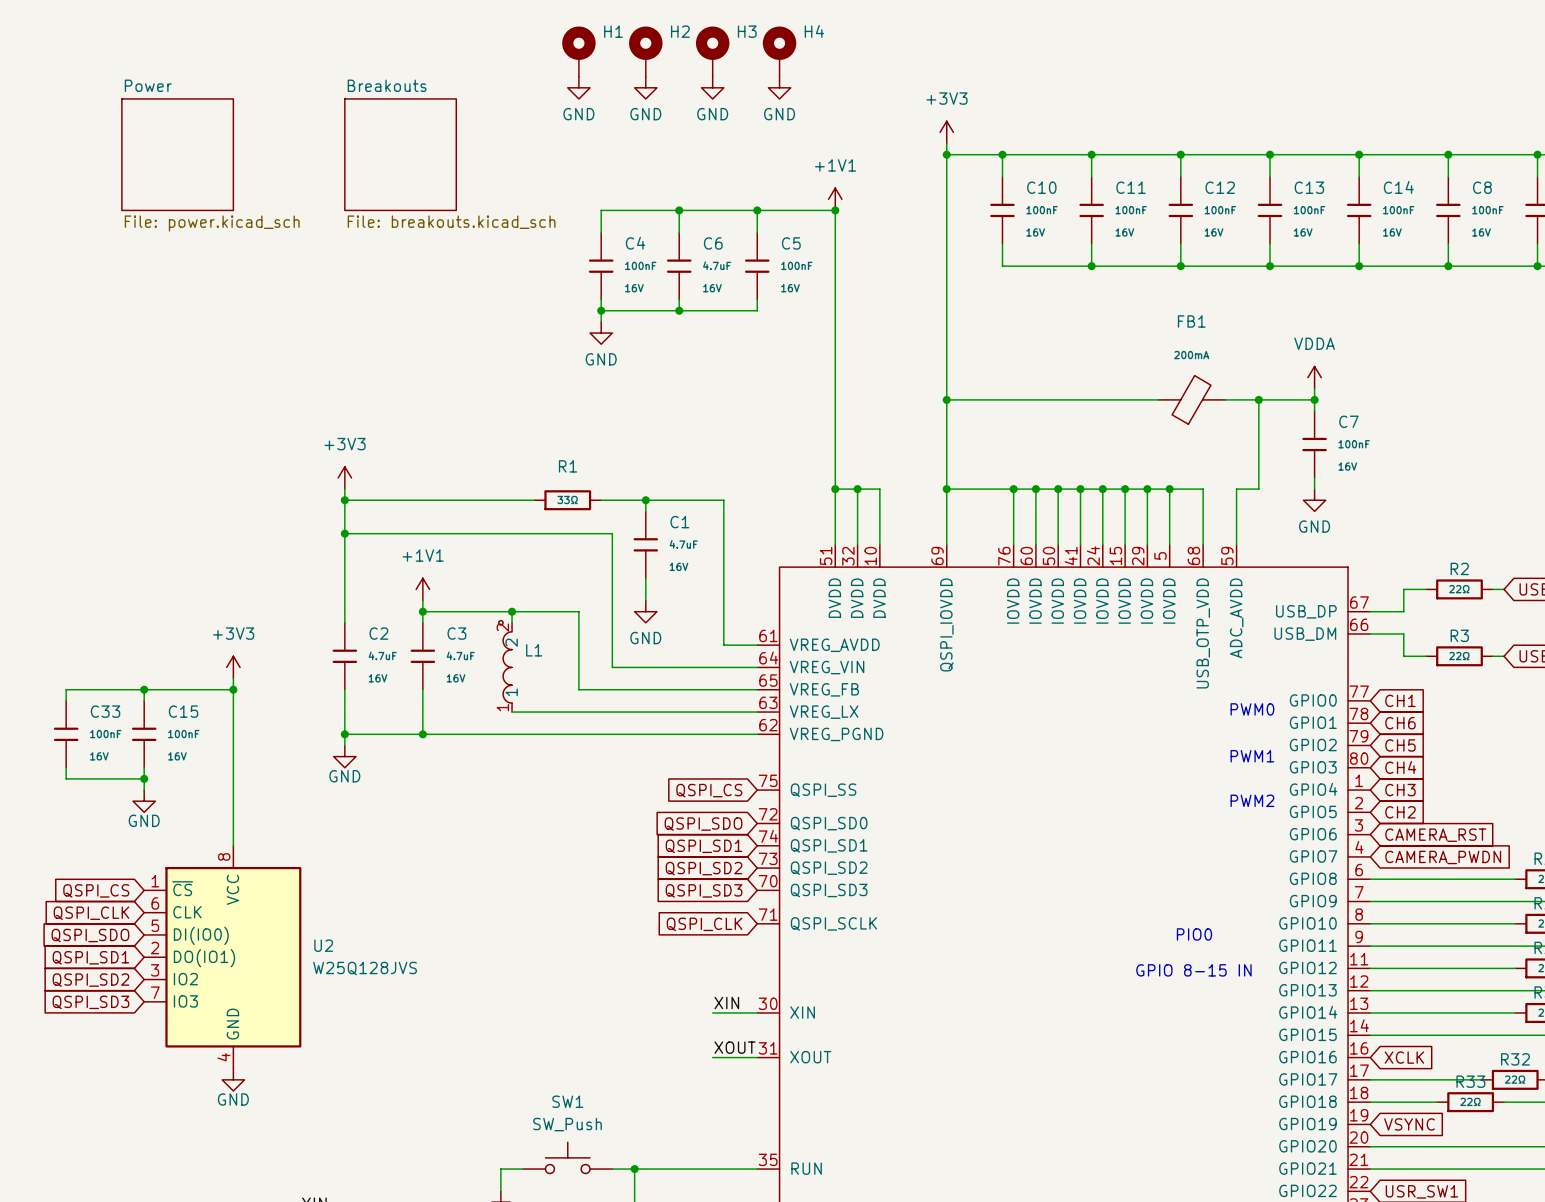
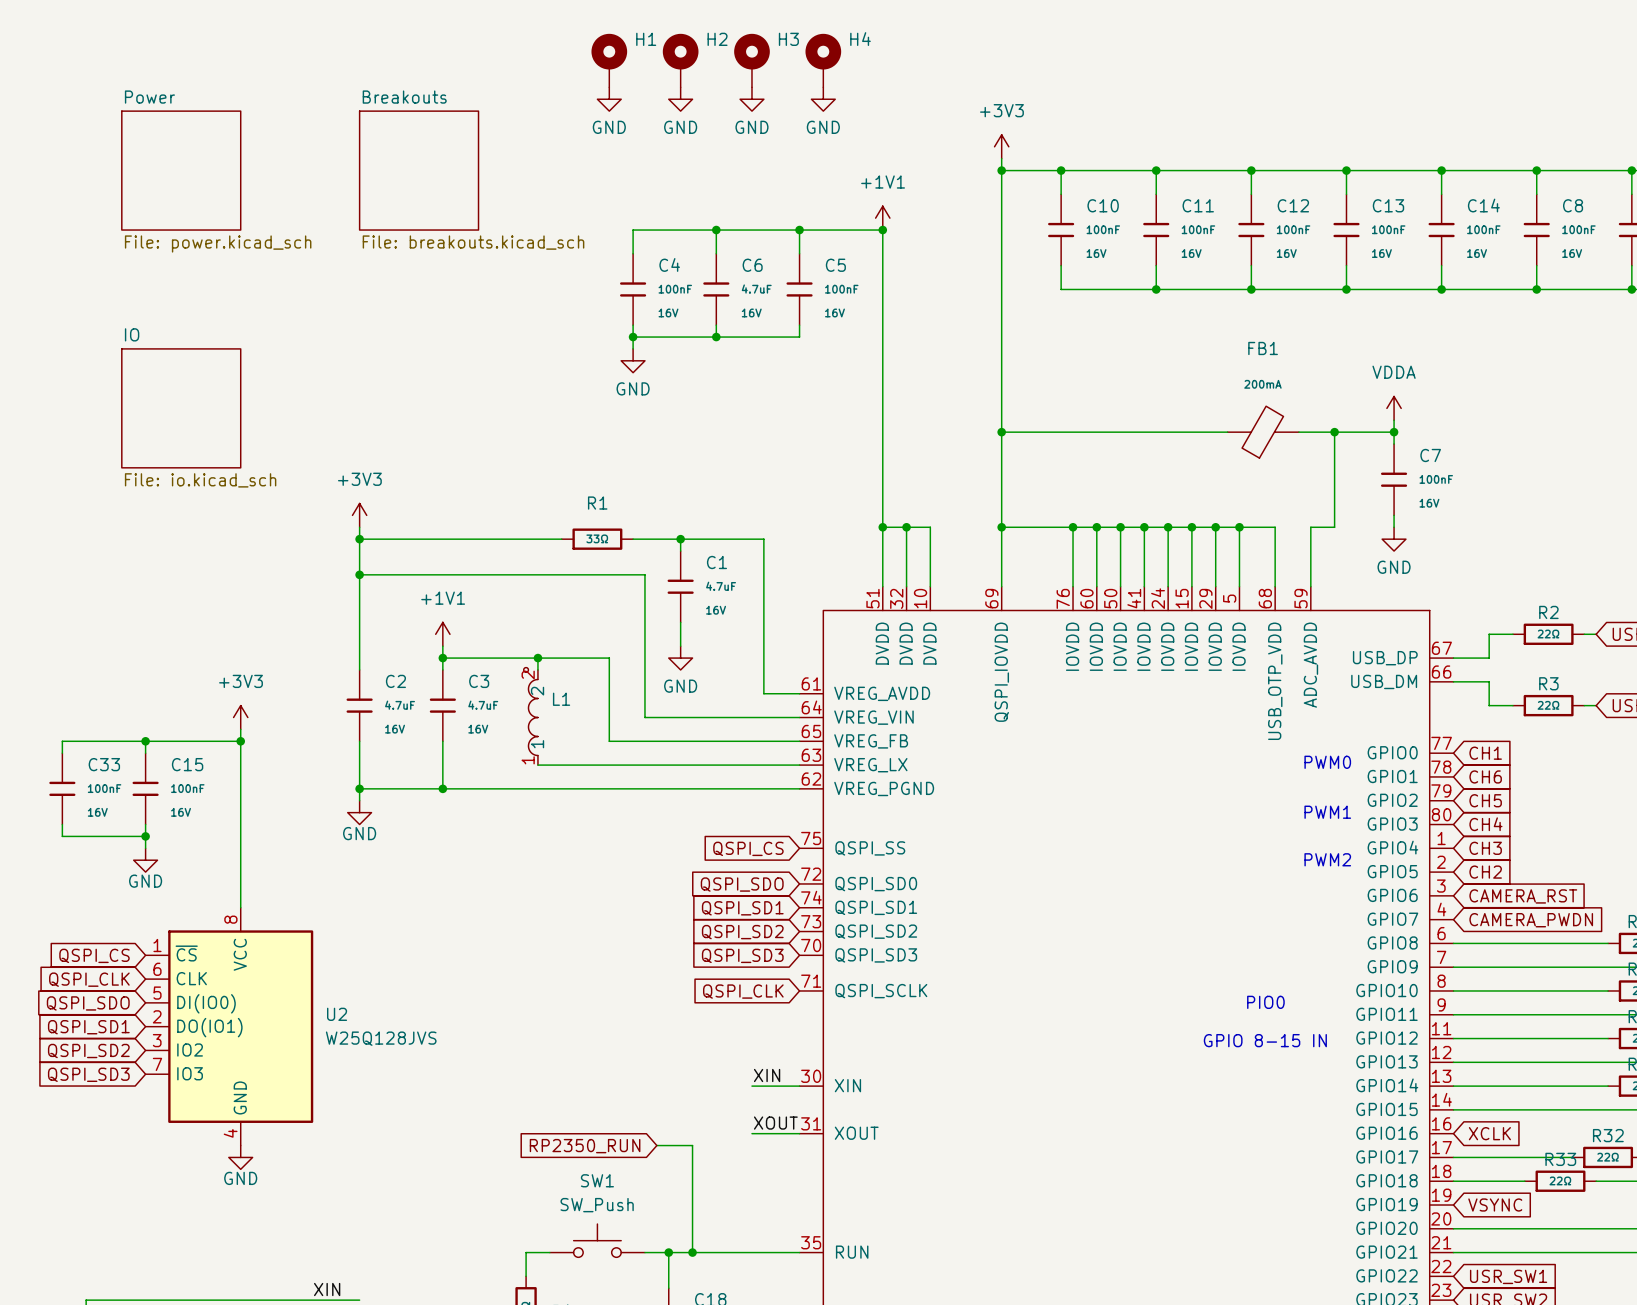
sheet IO: none -> File: io.kicad_sch (181, 408)
wire: none -> (656, 1145) (692, 1145) (692, 1252)
global label: none -> RP2350_RUN (585, 1146)
junction: none -> (692, 1252)

